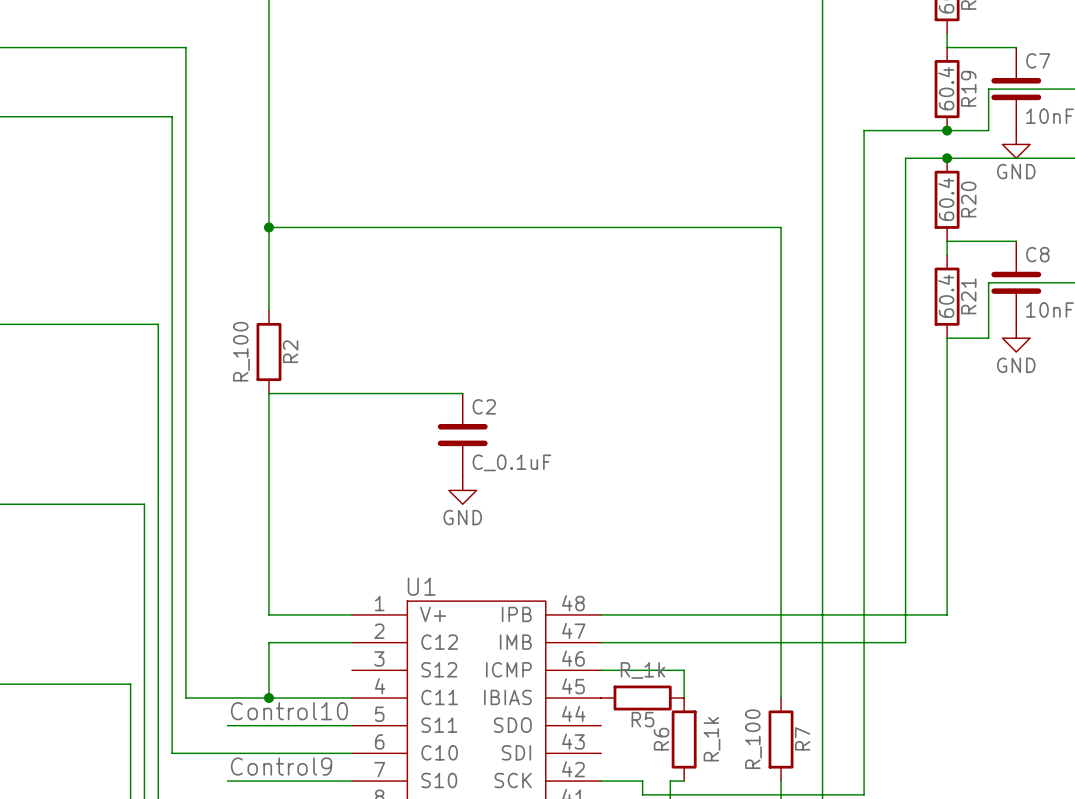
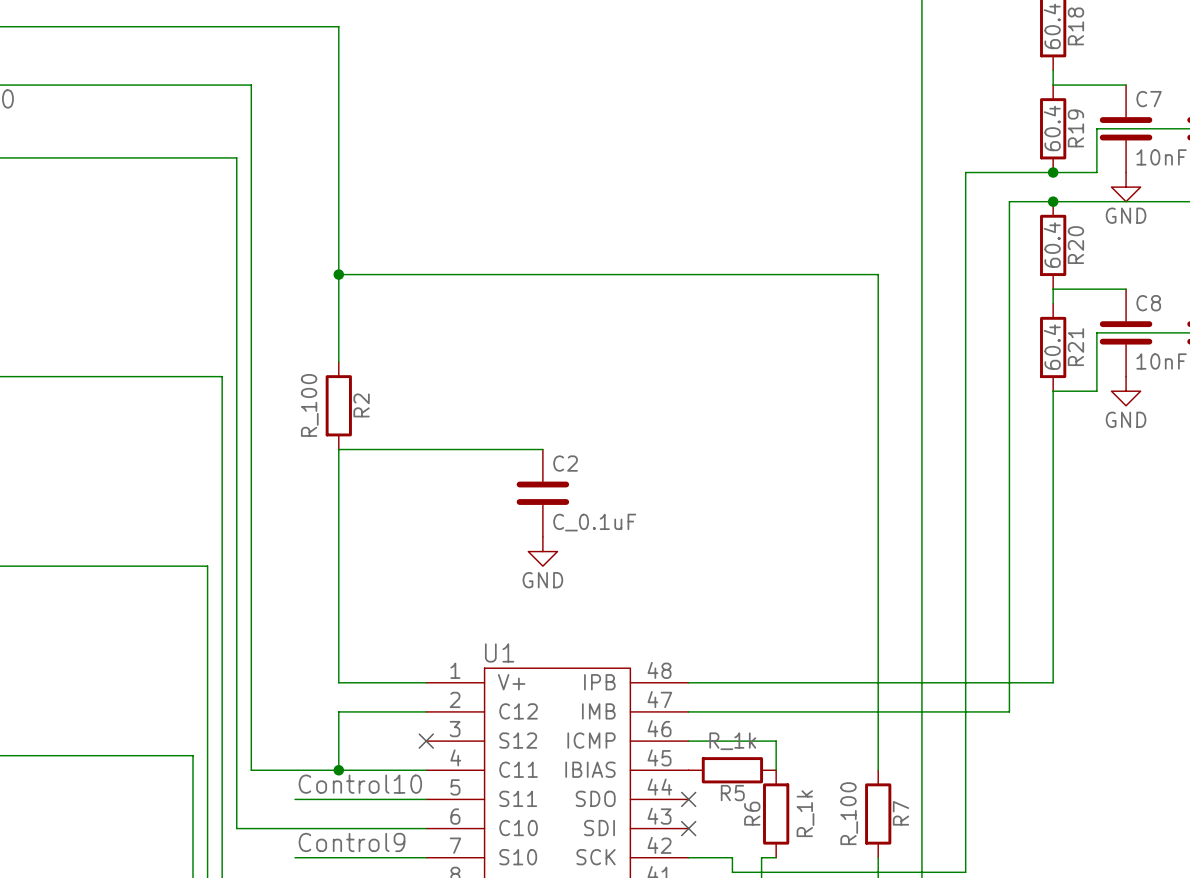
no-connect mark: none -> (426, 741)
no-connect mark: none -> (688, 799)
no-connect mark: none -> (688, 828)

